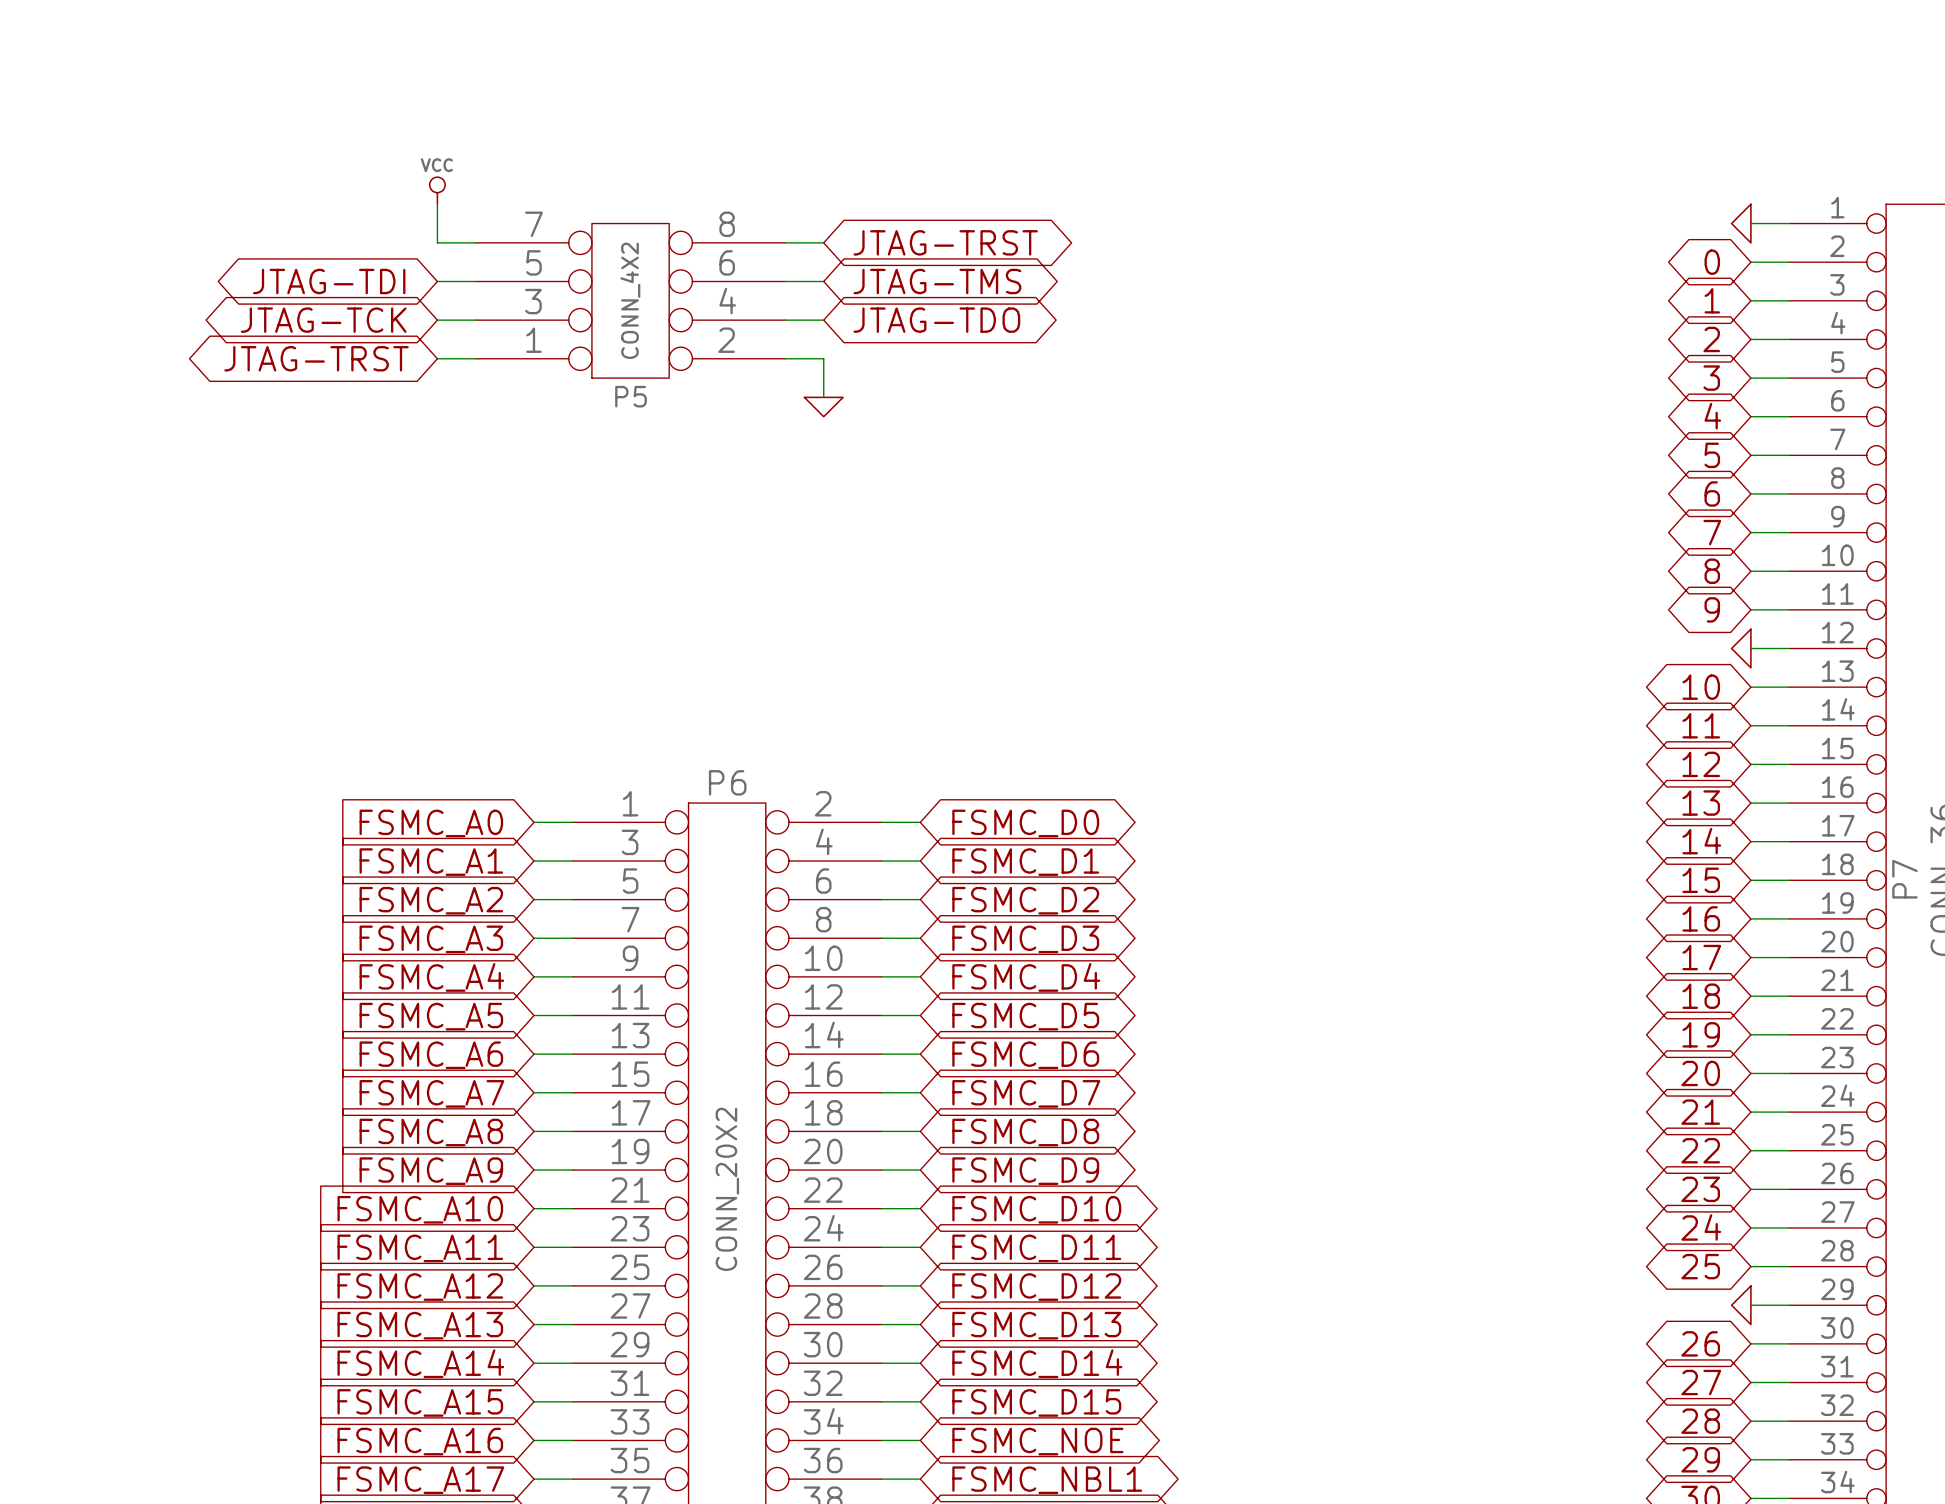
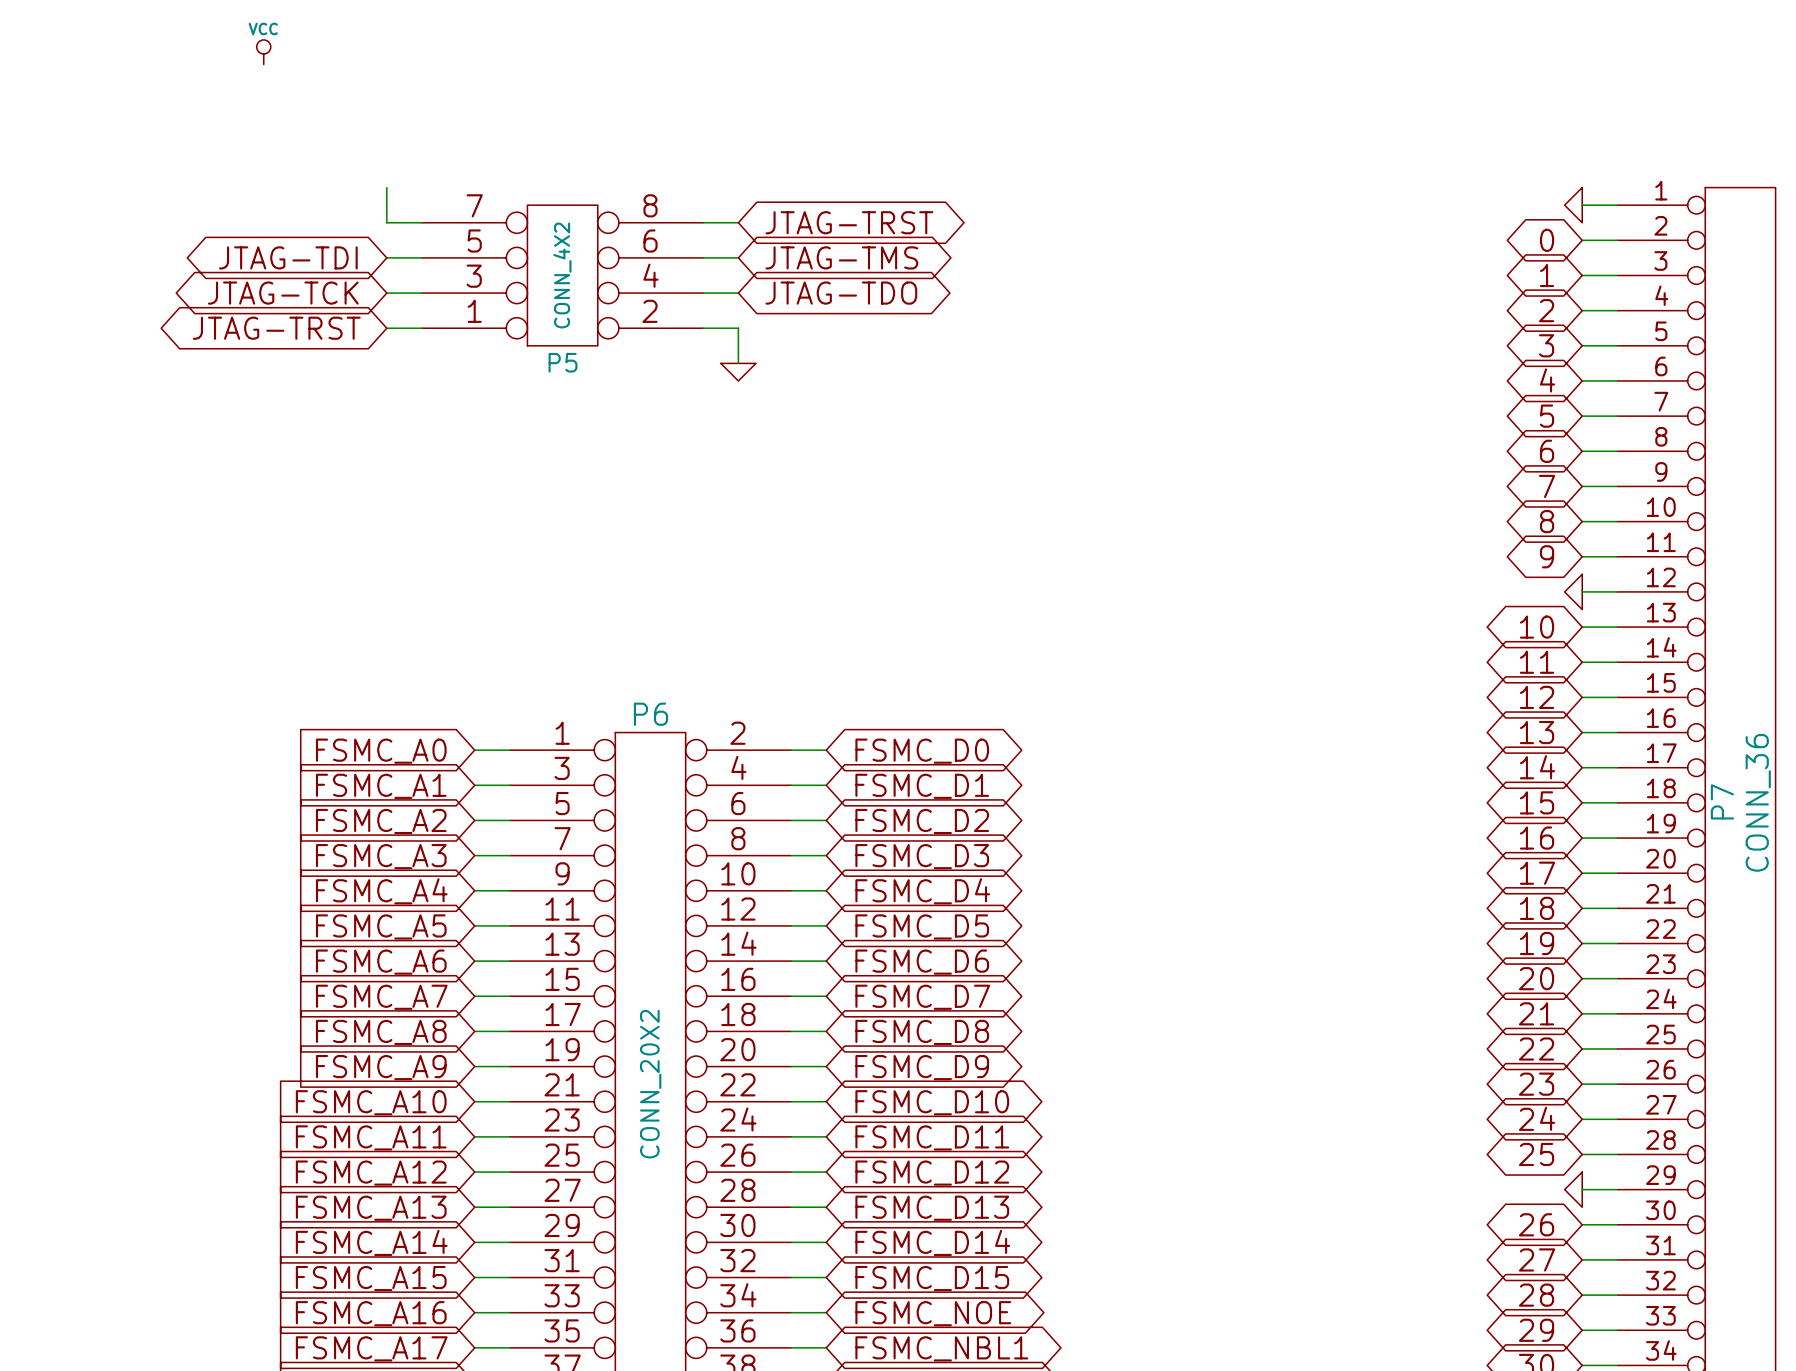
power symbol position: VCC (437, 190) -> VCC (263, 52)

